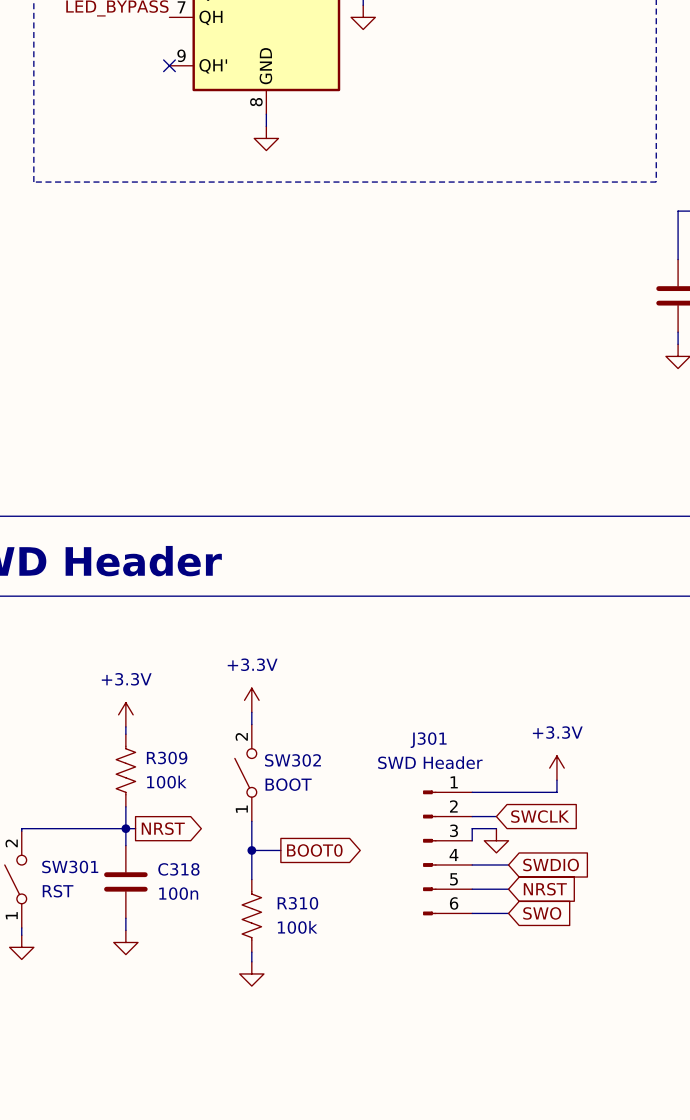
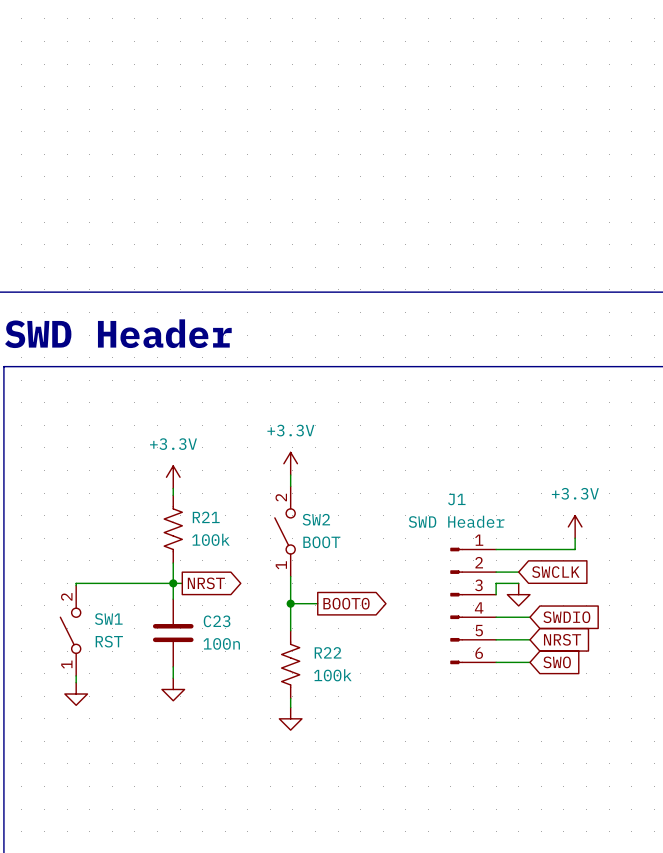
J301 name: J301 (428, 740) -> J1 (456, 499)
R309 name: R309 (167, 757) -> R21 (206, 517)
SW302 name: SW302 (292, 760) -> SW2 (316, 519)
SW301 name: SW301 (70, 866) -> SW1 (108, 619)
C318 name: C318 (178, 869) -> C23 (217, 621)
R310 name: R310 (297, 903) -> R22 (328, 652)

